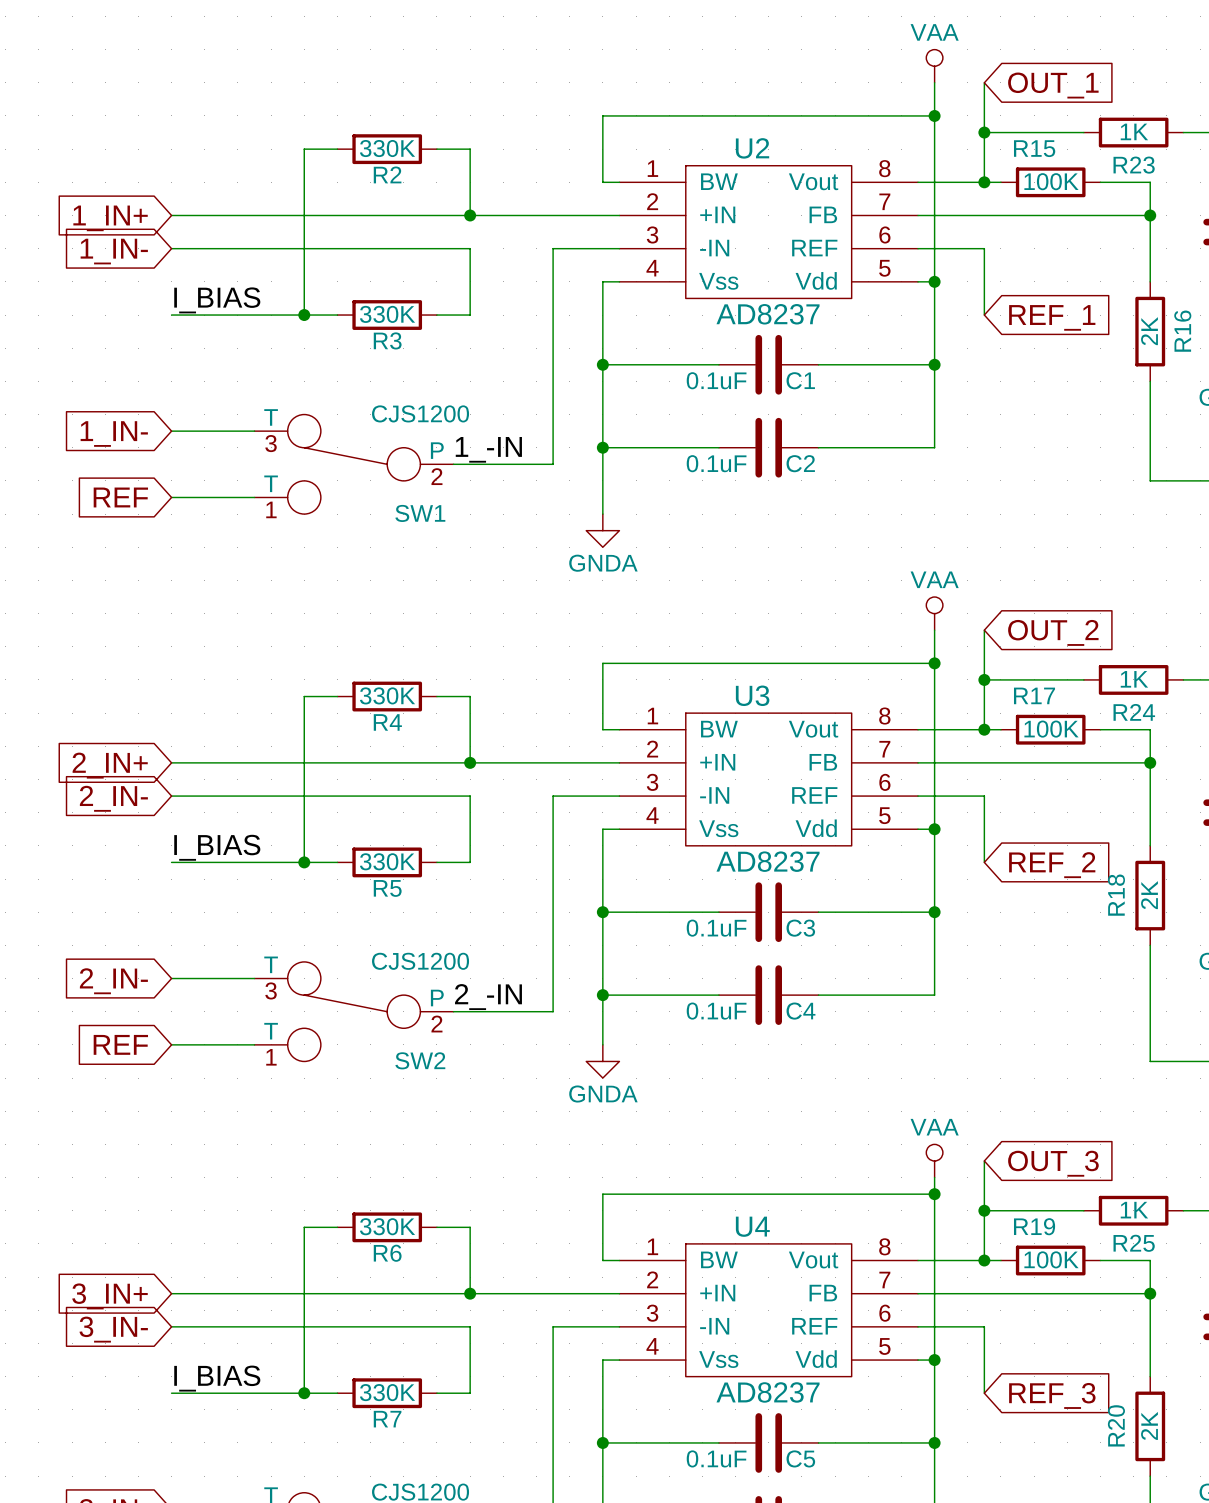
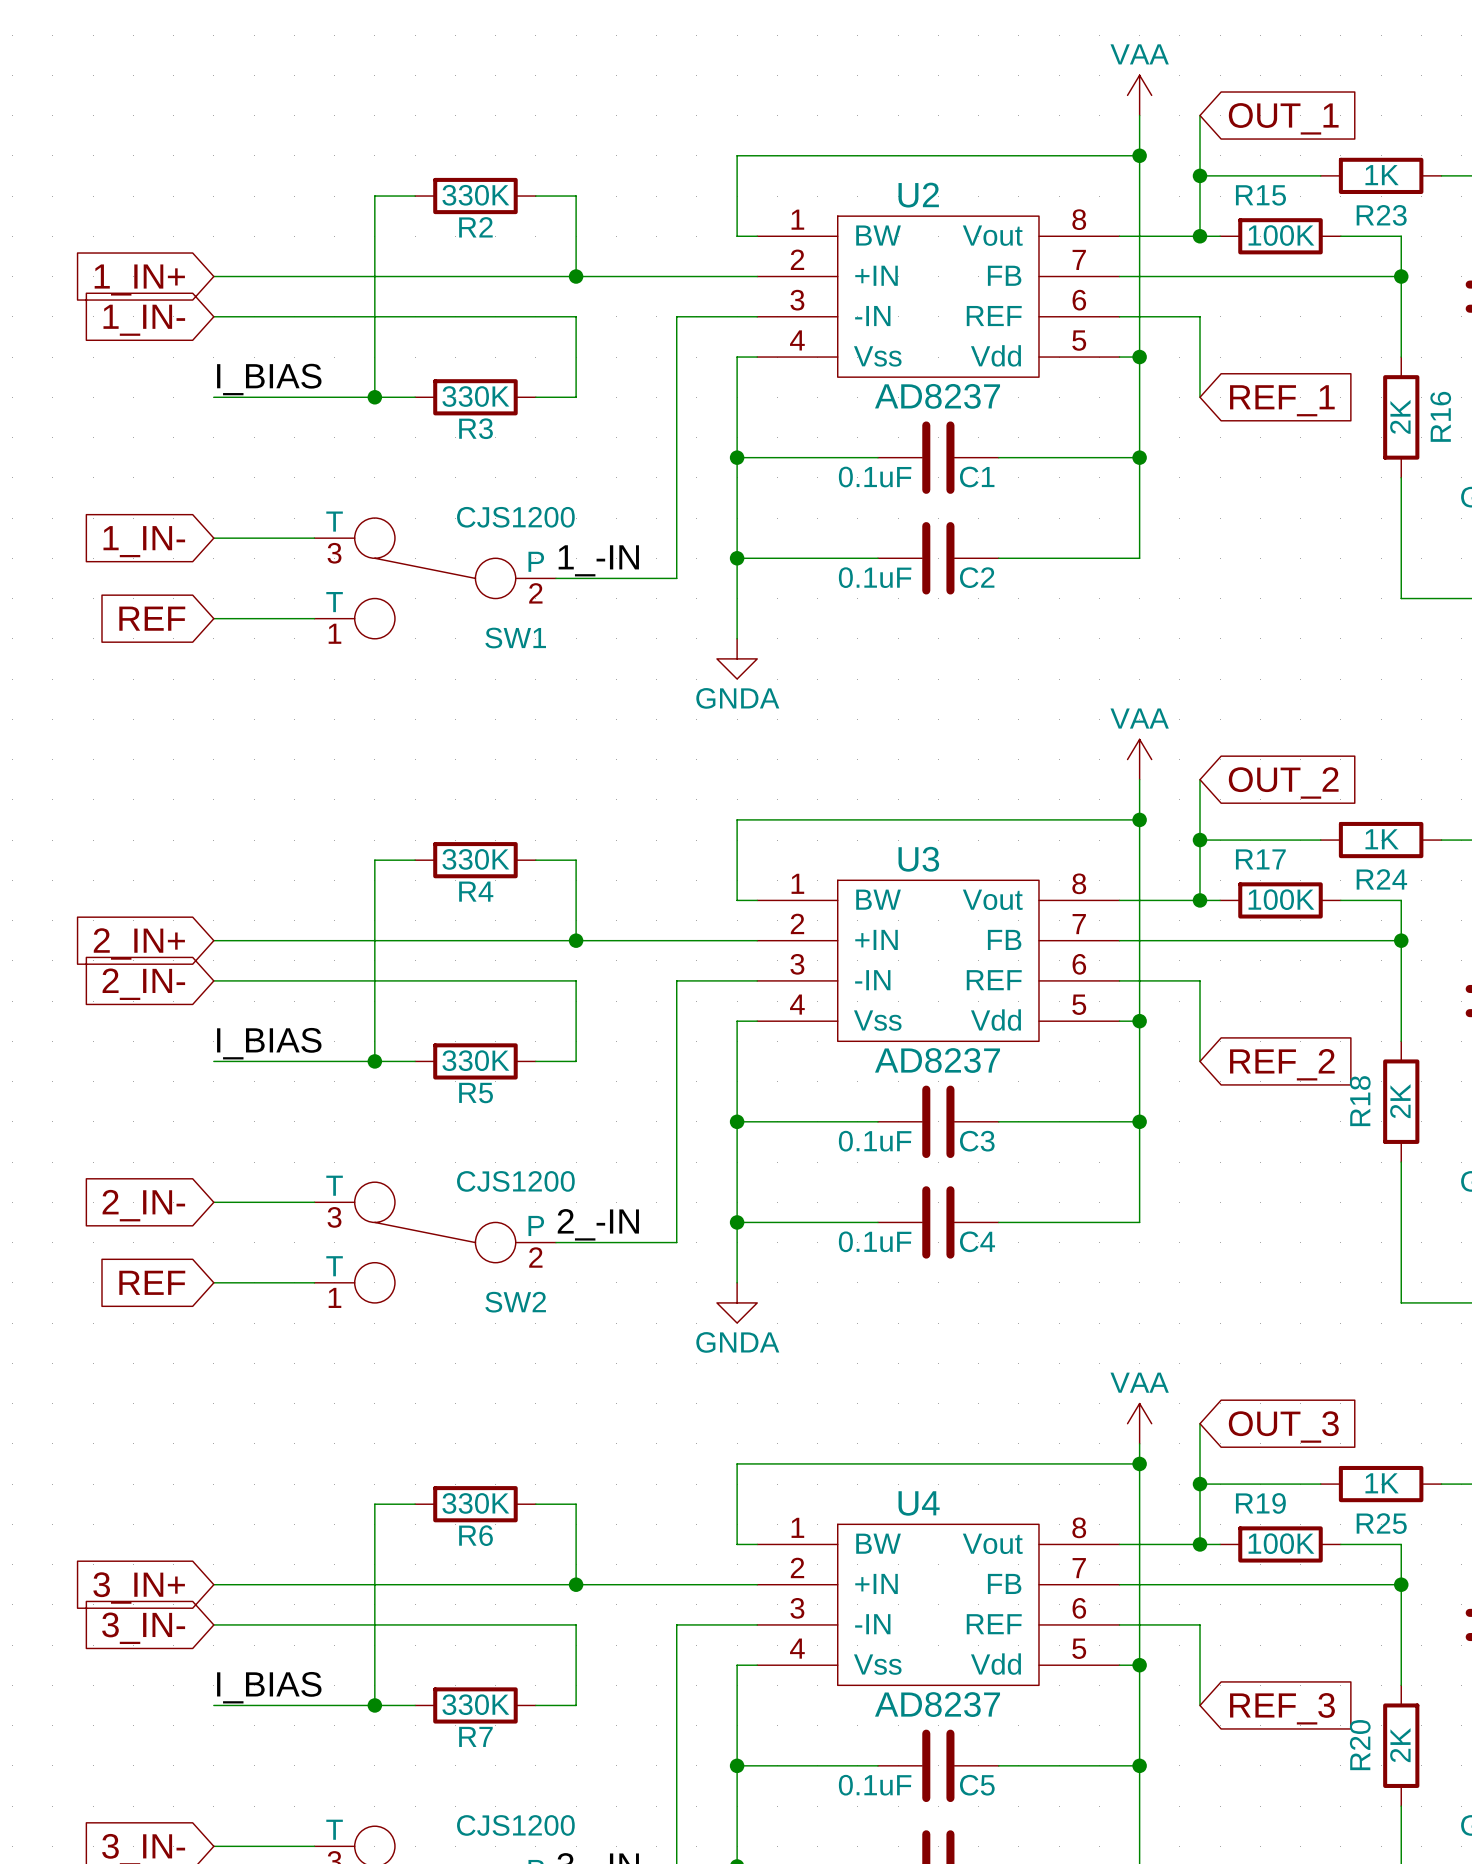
power symbol shape: [926, 49, 943, 83] -> [1127, 75, 1152, 116]
power symbol shape: [926, 597, 943, 631] -> [1127, 739, 1152, 780]
power symbol shape: [926, 1144, 943, 1178] -> [1127, 1403, 1152, 1444]

